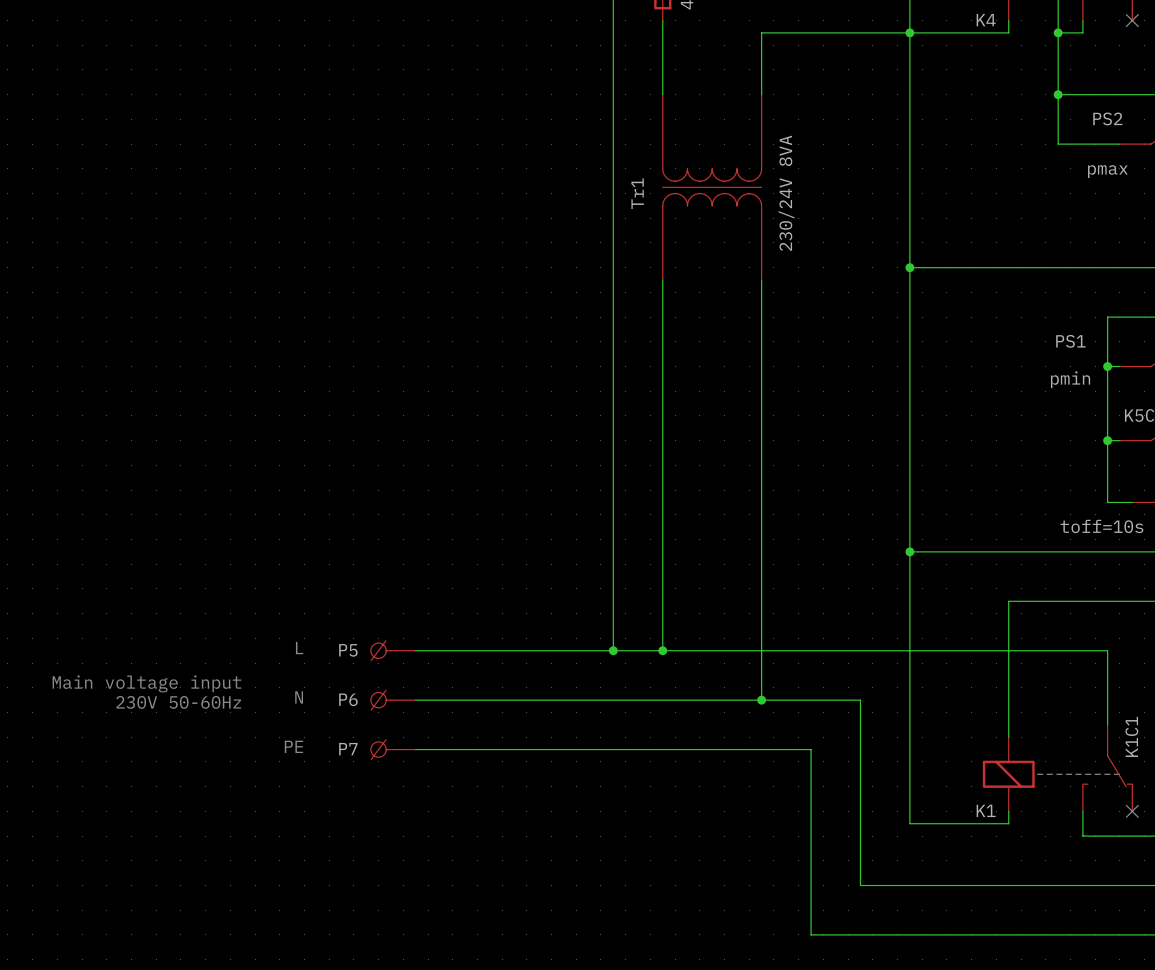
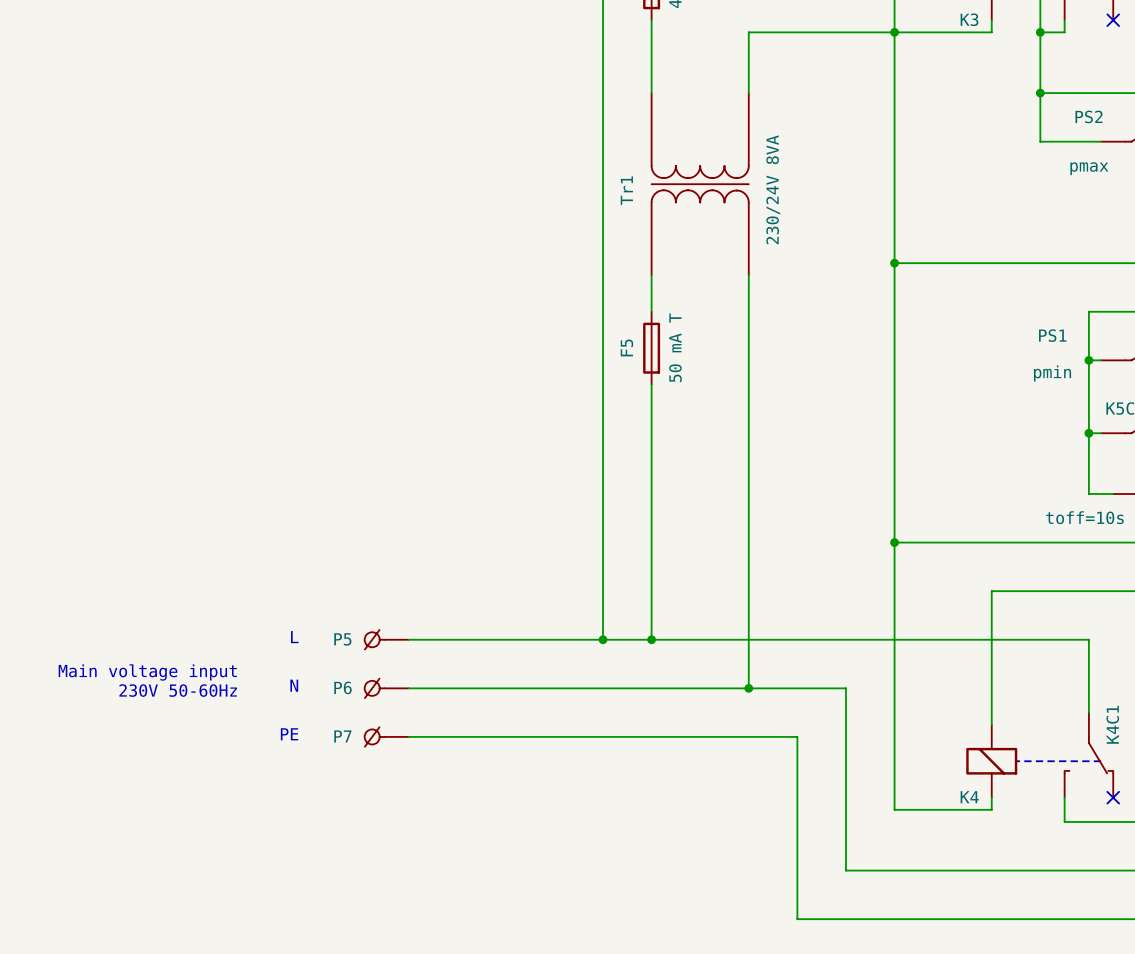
K4 name: K4 (986, 20) -> K3 (969, 19)
F5: none -> 50 mA T (651, 348)
K1C1 name: K1C1 (1131, 736) -> K4C1 (1112, 724)
K1 name: K1 (986, 810) -> K4 (969, 797)

